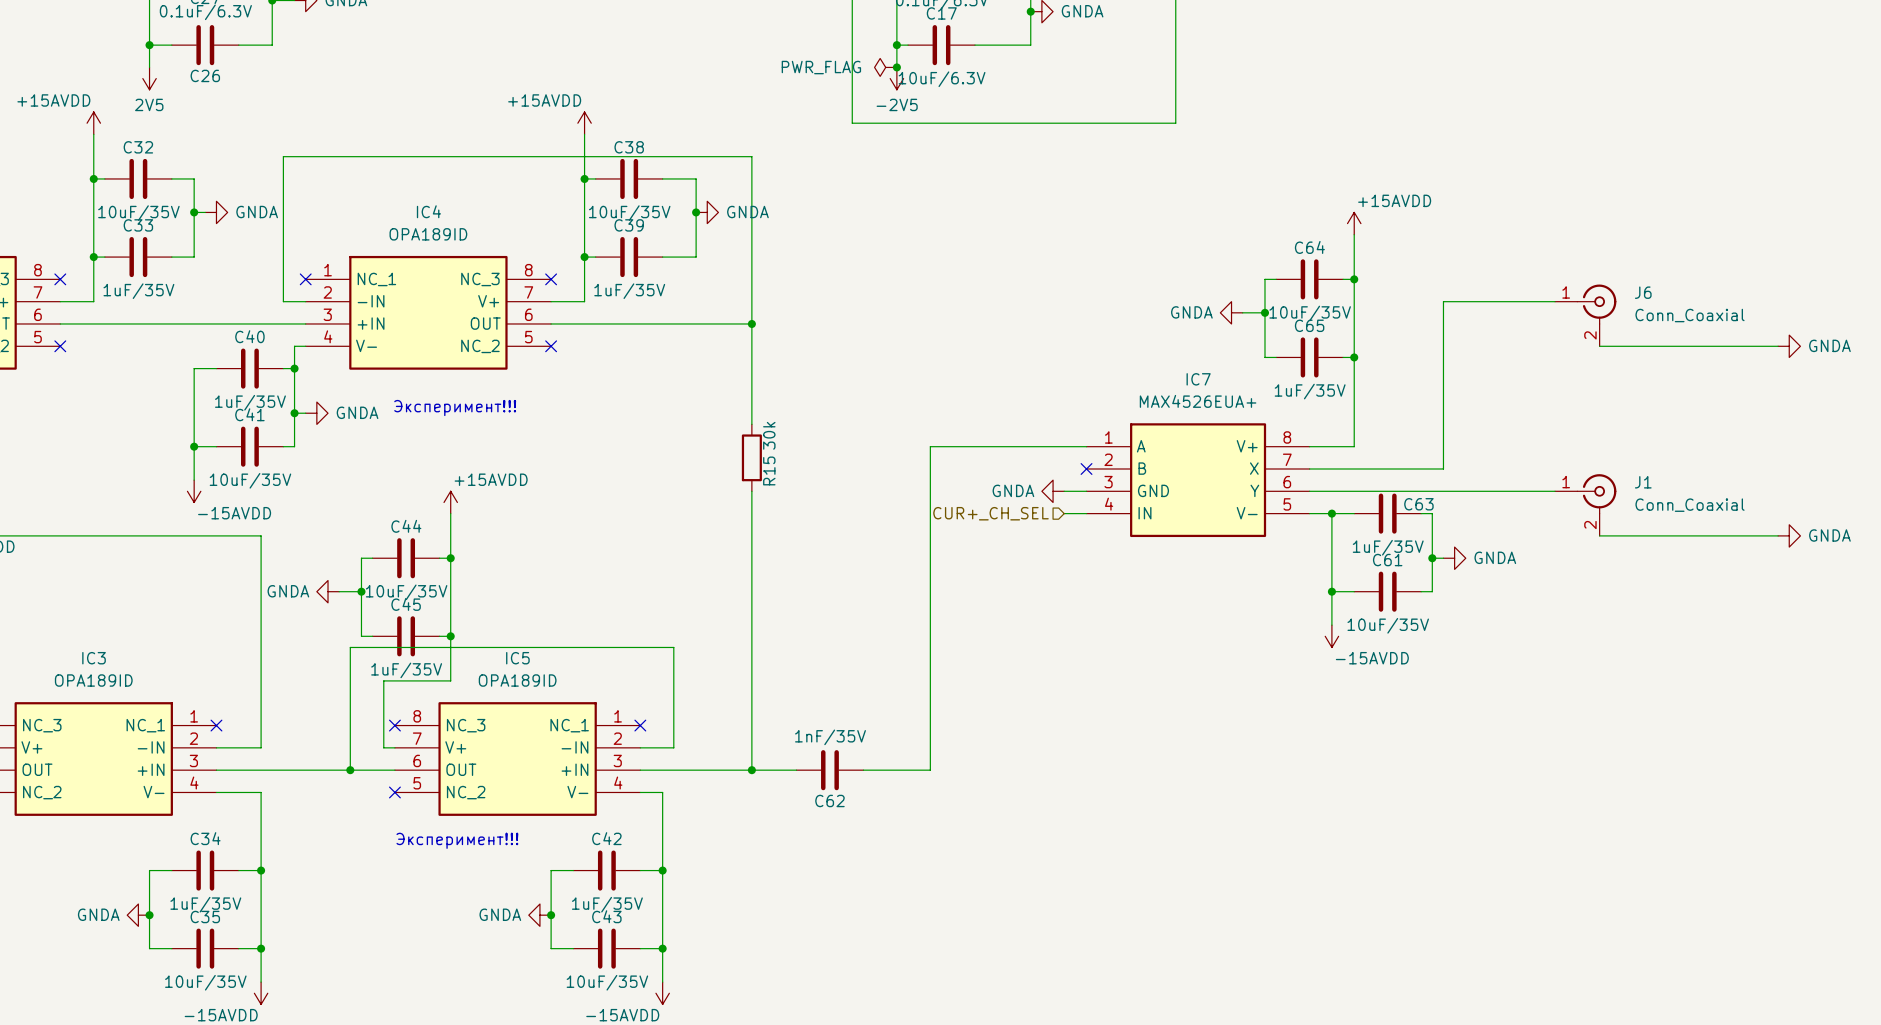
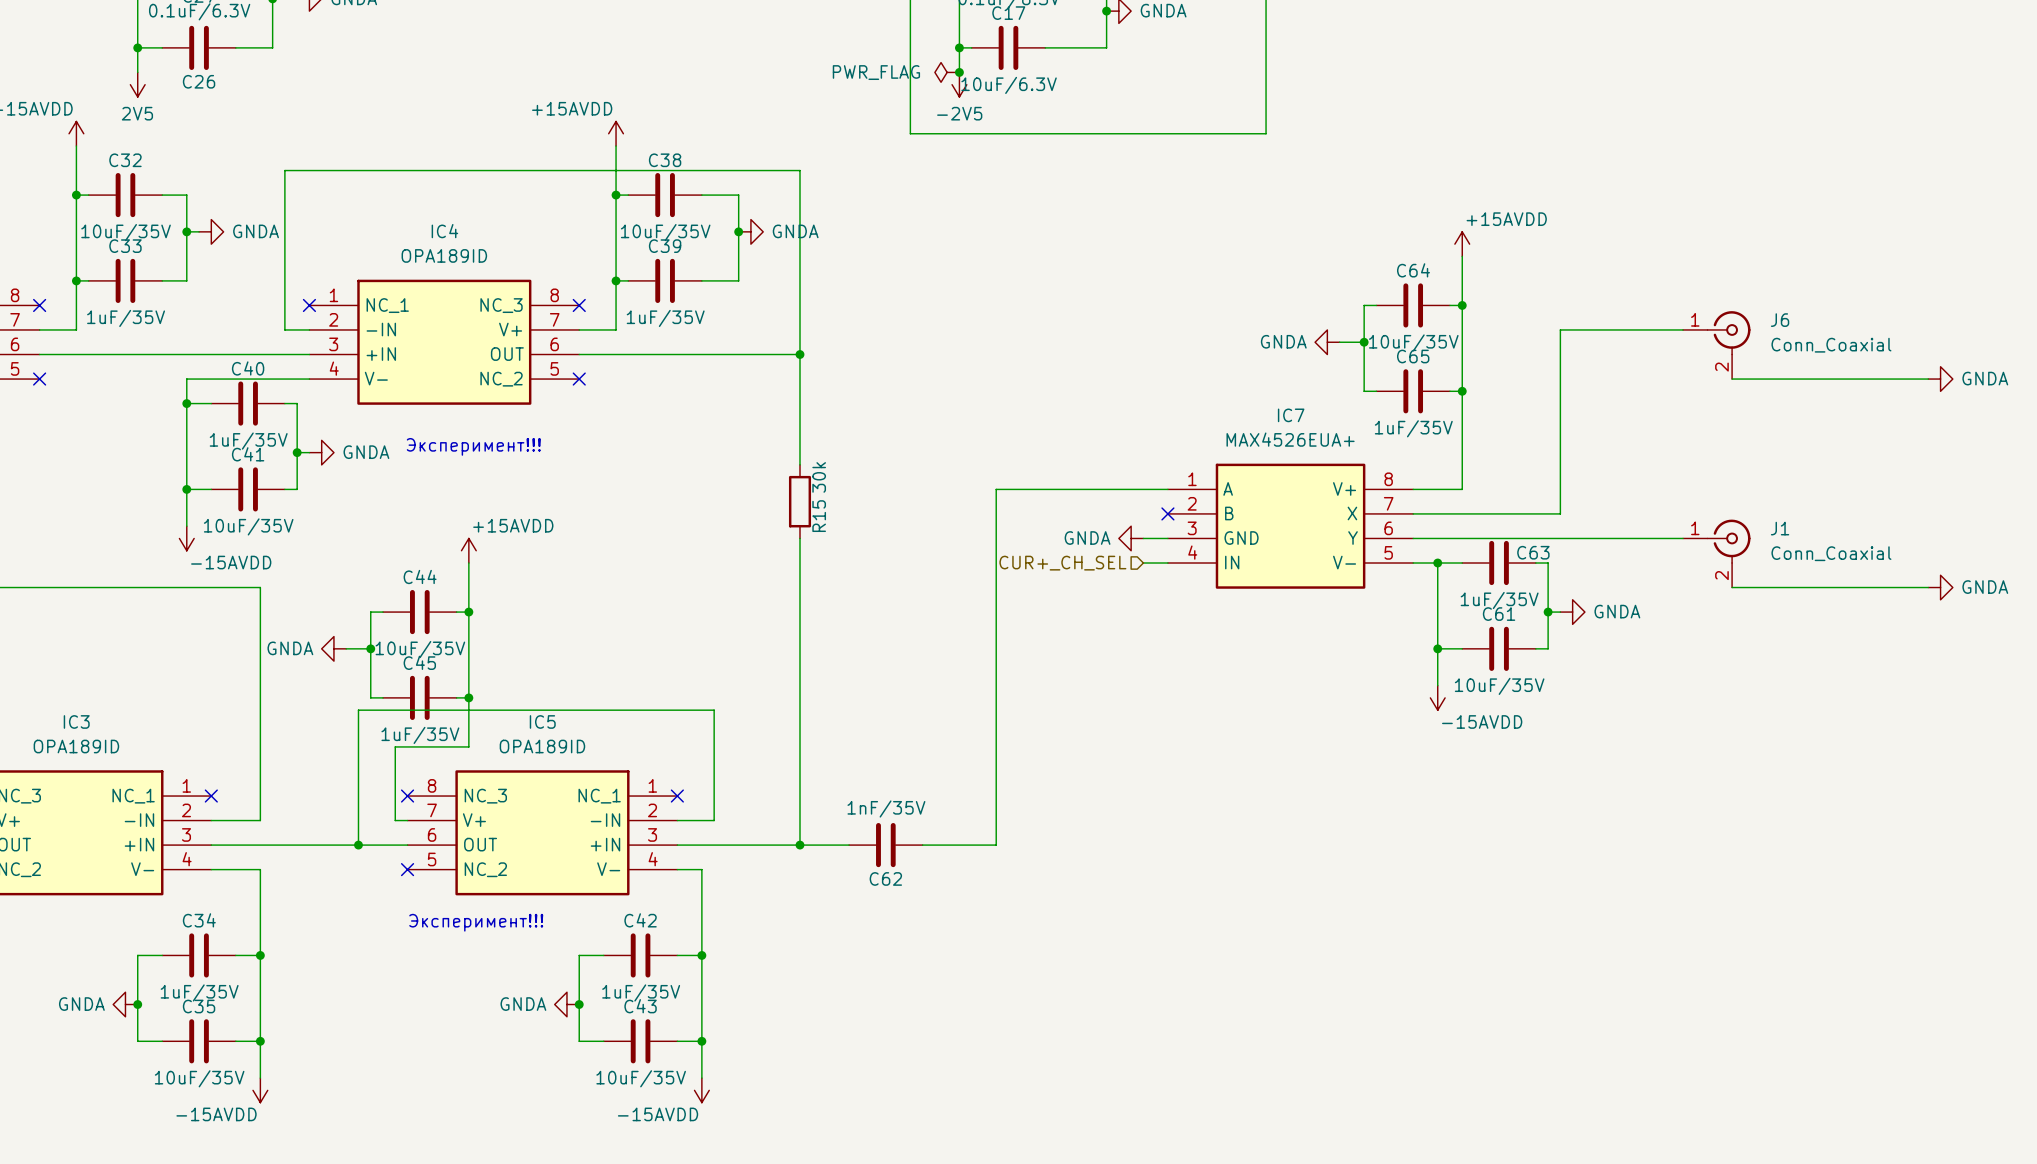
wire: (294, 346) (294, 368) -> (297, 379) (186, 379) (186, 403)
junction: none -> (186, 403)
junction: (294, 368) -> none

